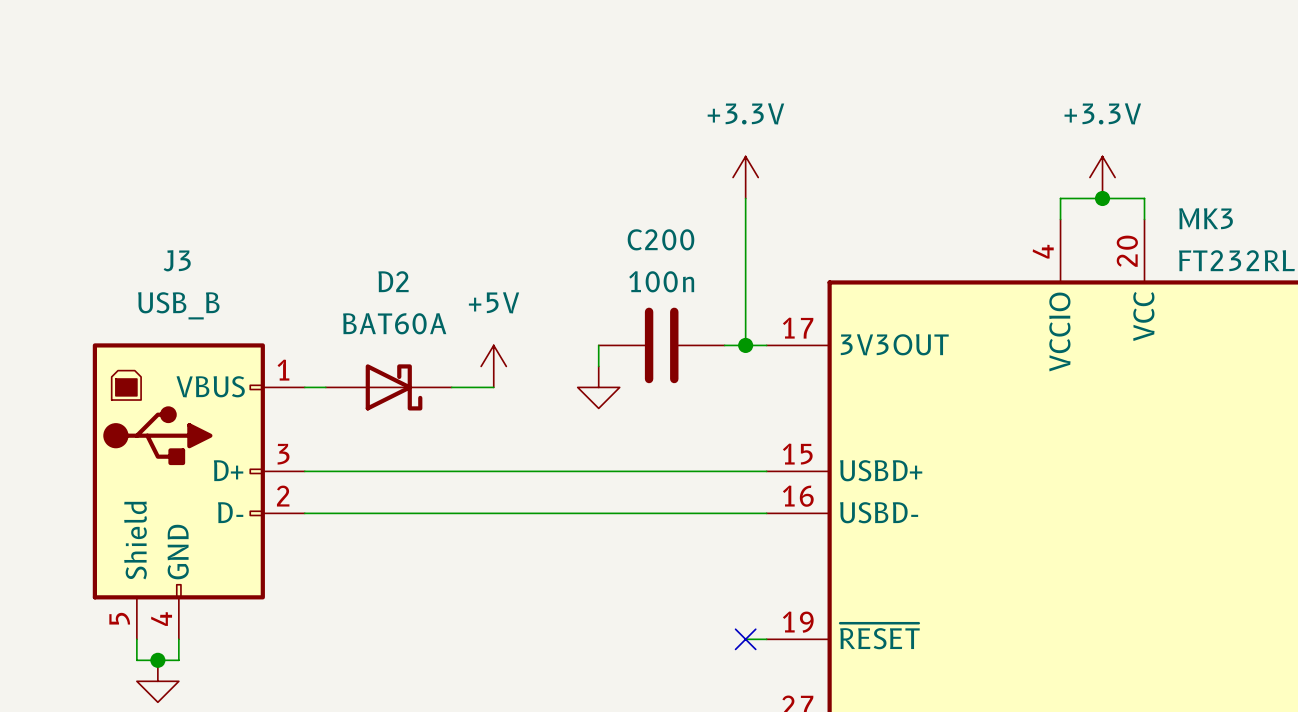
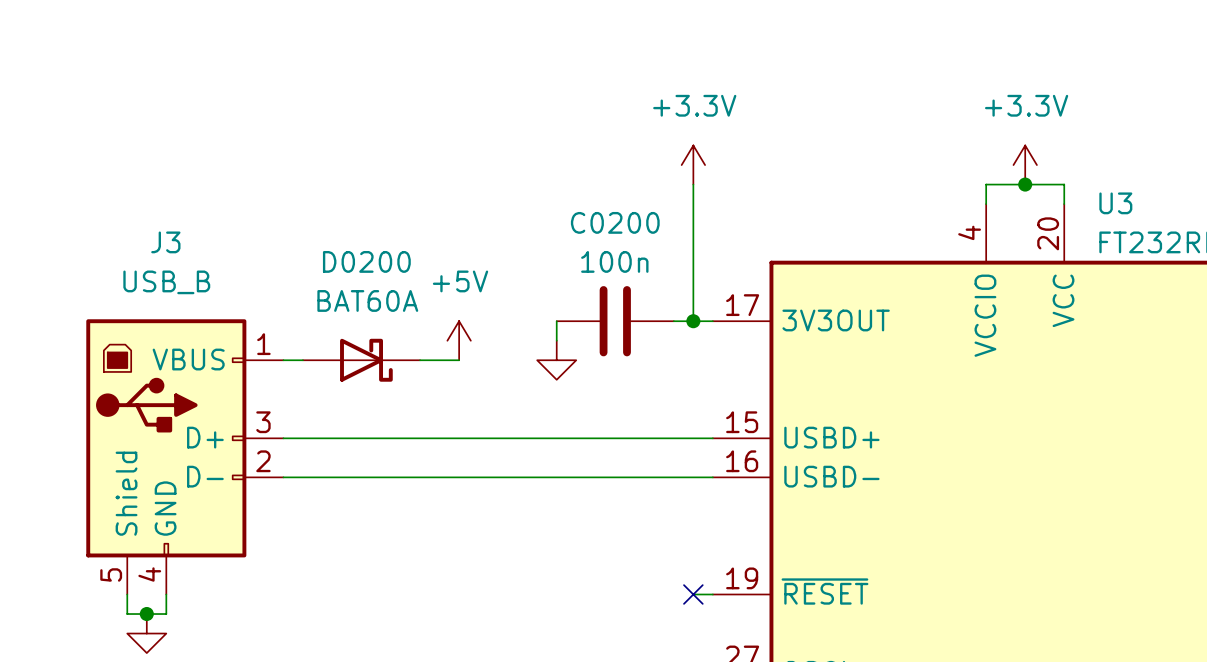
MK3 name: MK3 (1206, 218) -> U3 (1115, 203)
C200 name: C200 (660, 239) -> C0200 (615, 222)
D2 name: D2 (393, 281) -> D0200 (366, 261)

